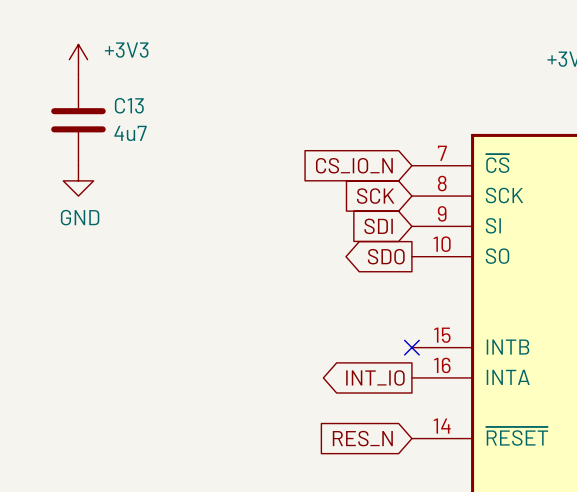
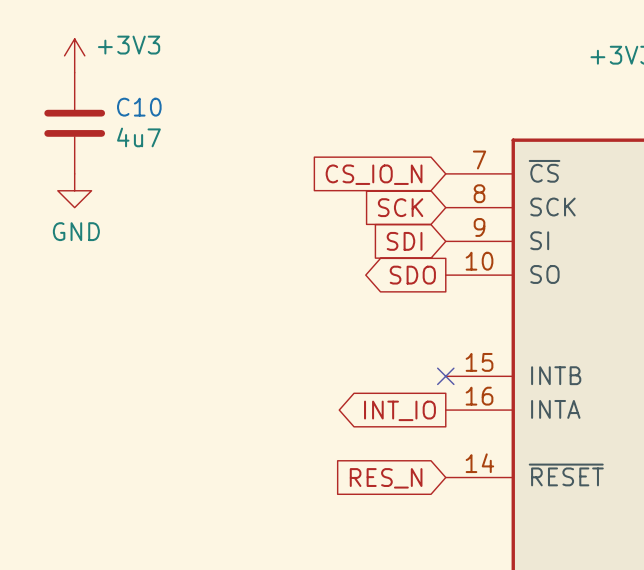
C13 name: C13 (129, 105) -> C10 (139, 107)

